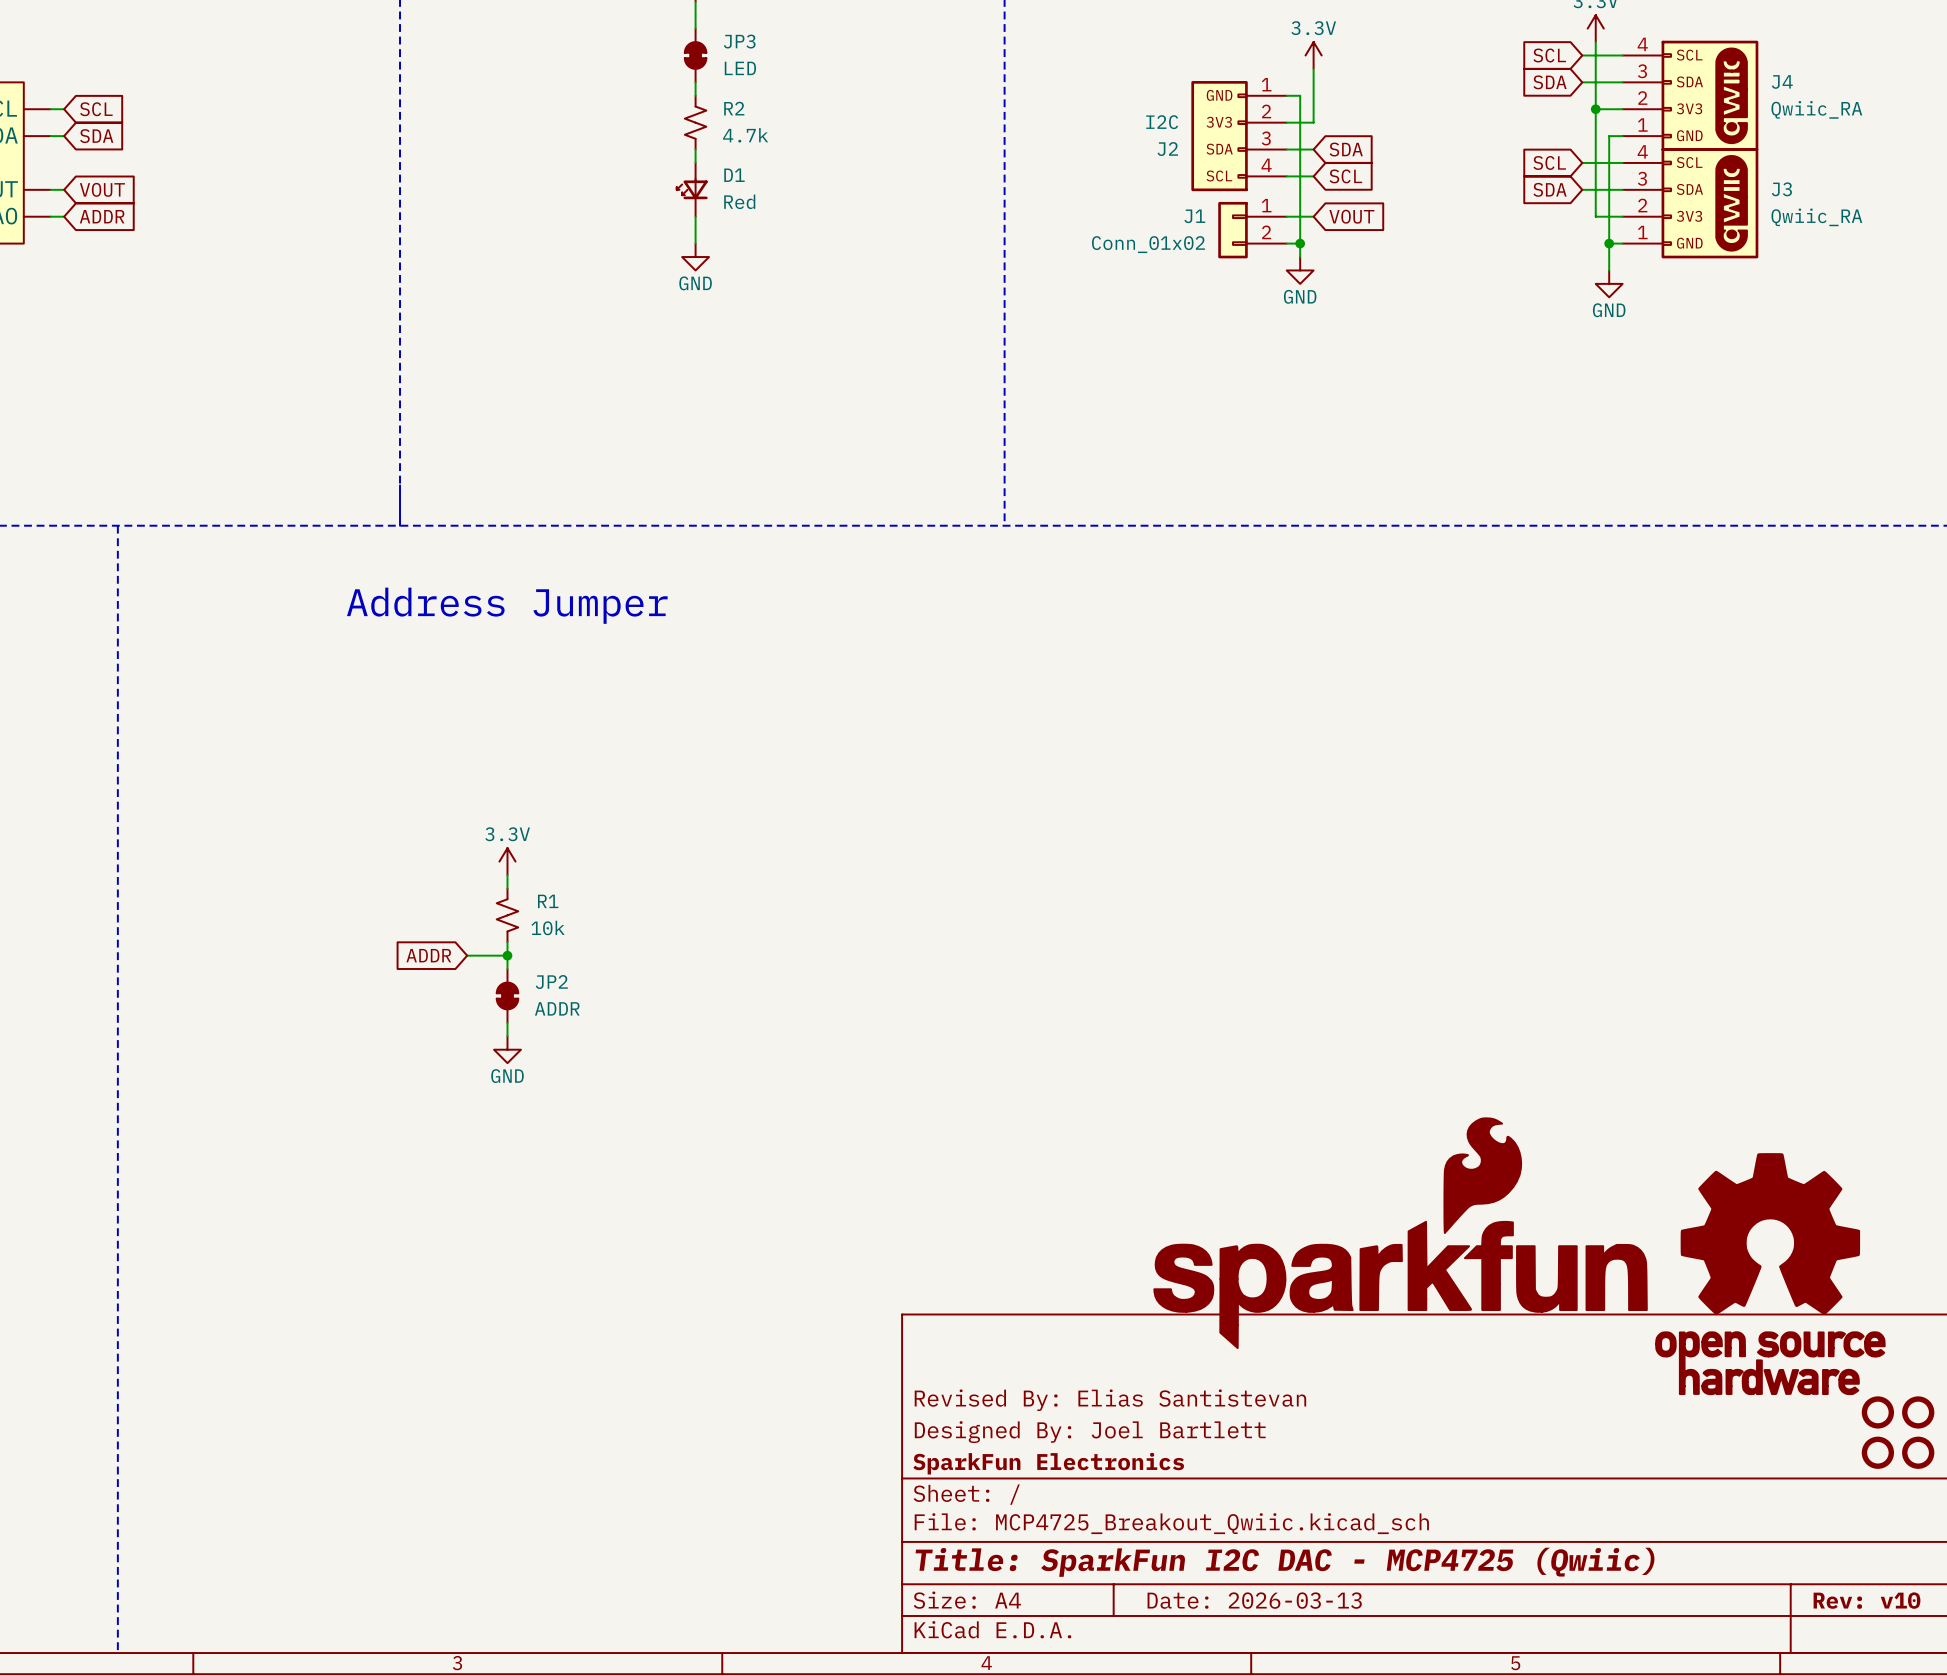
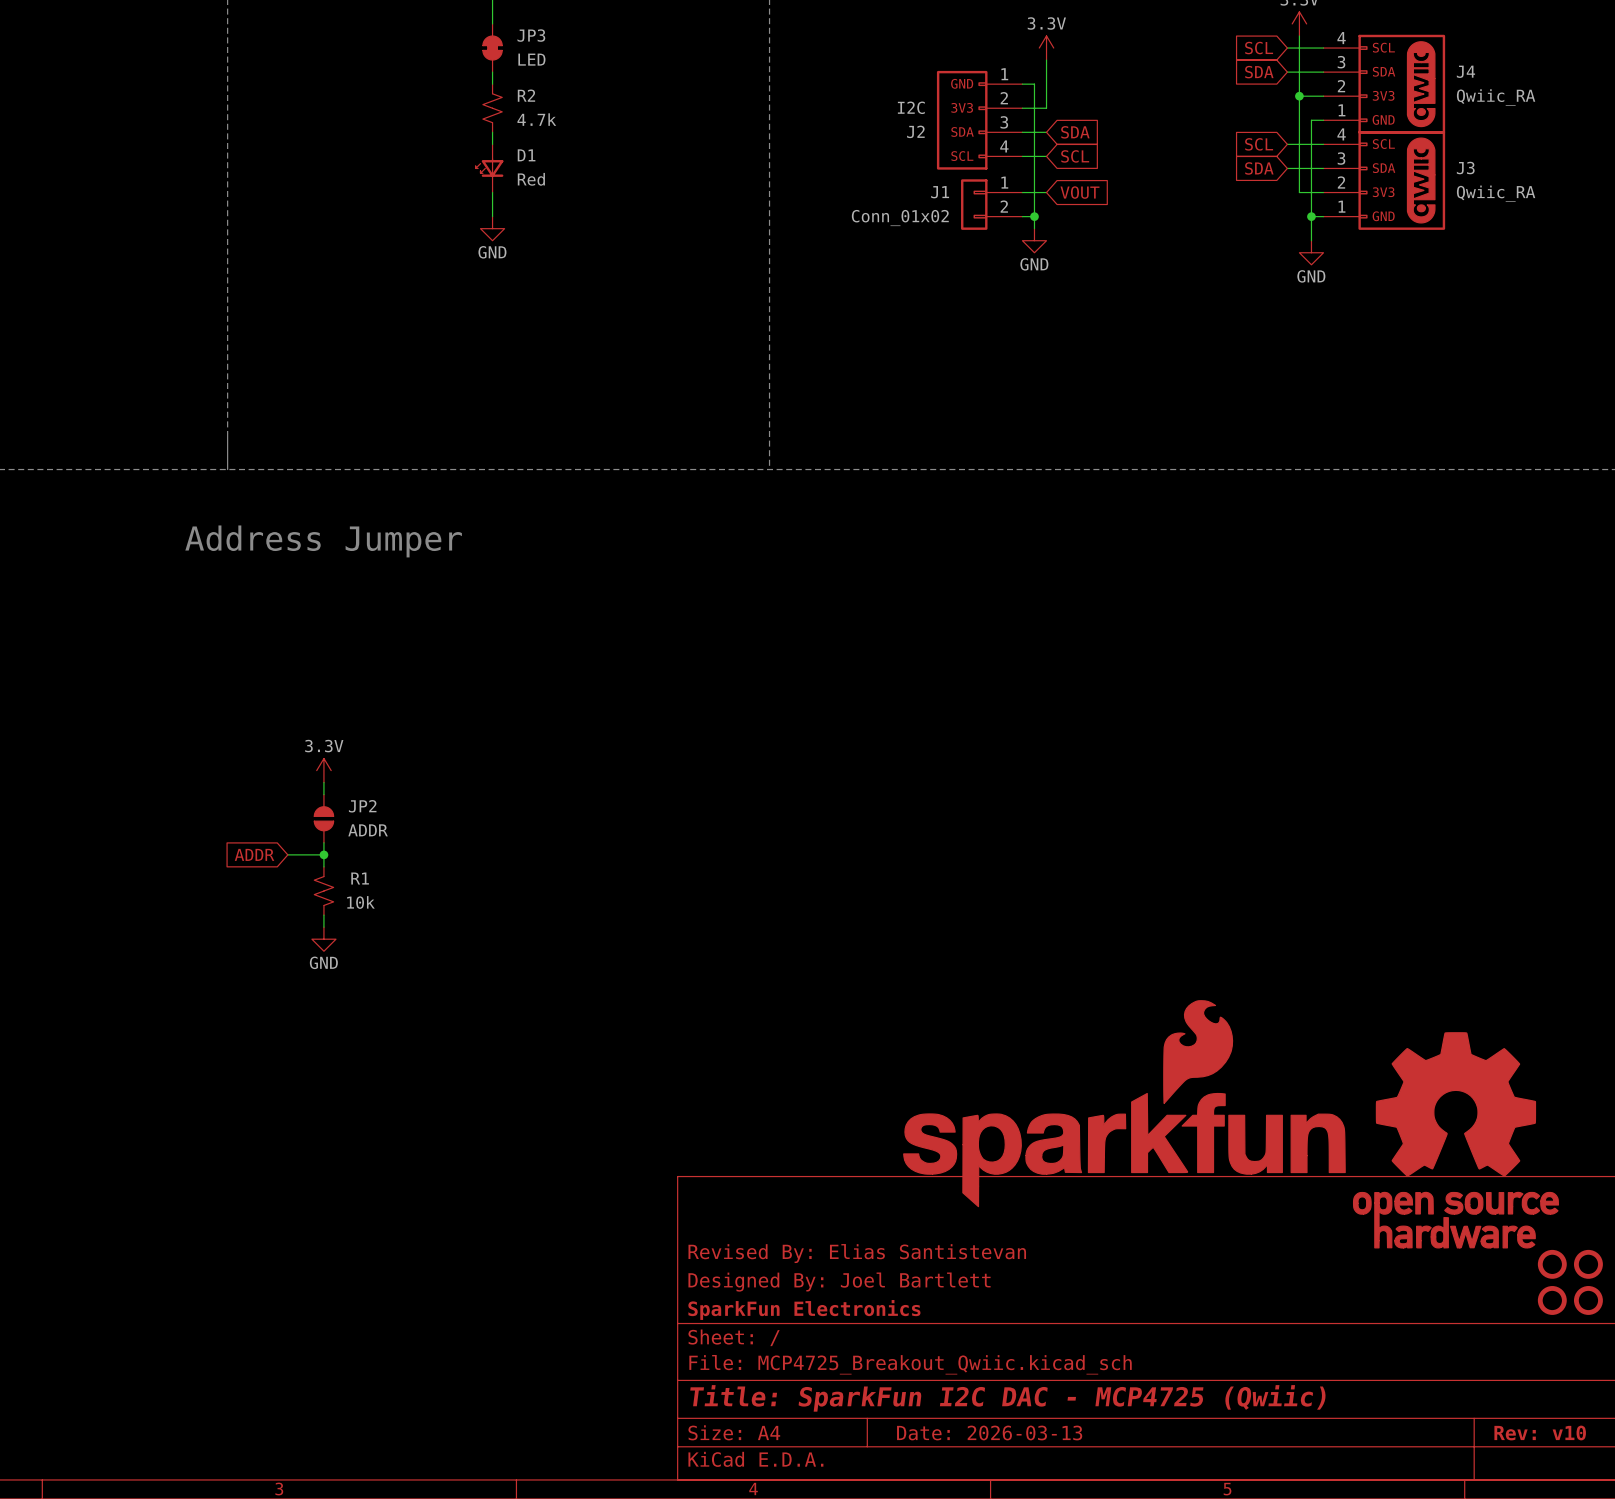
R1 position: (507, 915) -> (323, 891)
JP2 symbol: [496, 969, 519, 1023] -> [314, 794, 334, 843]

